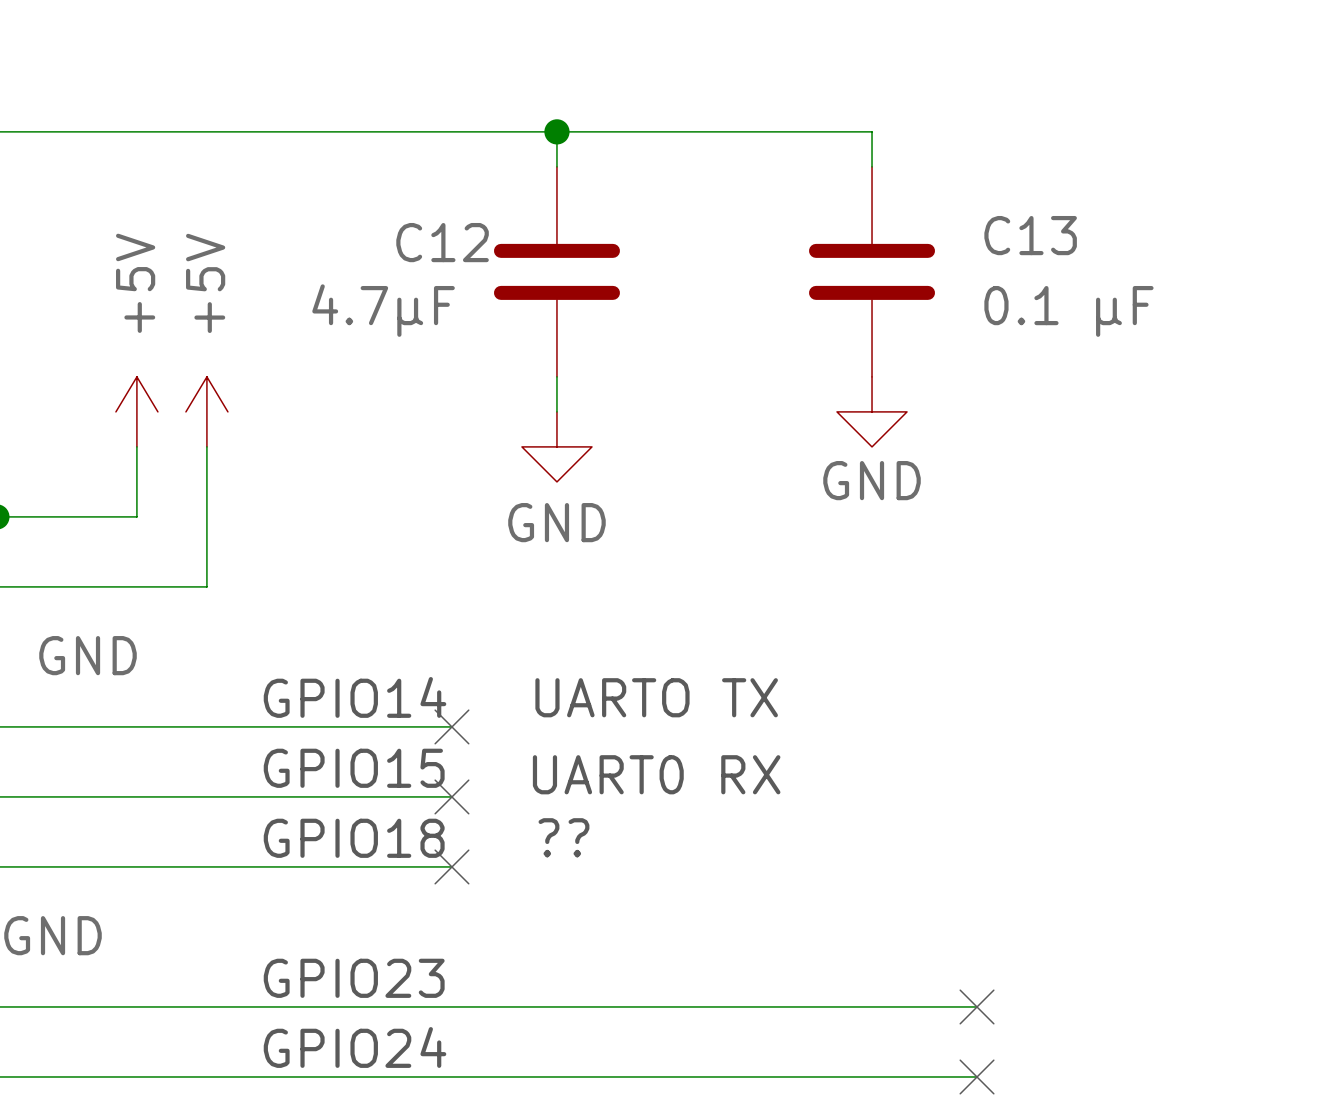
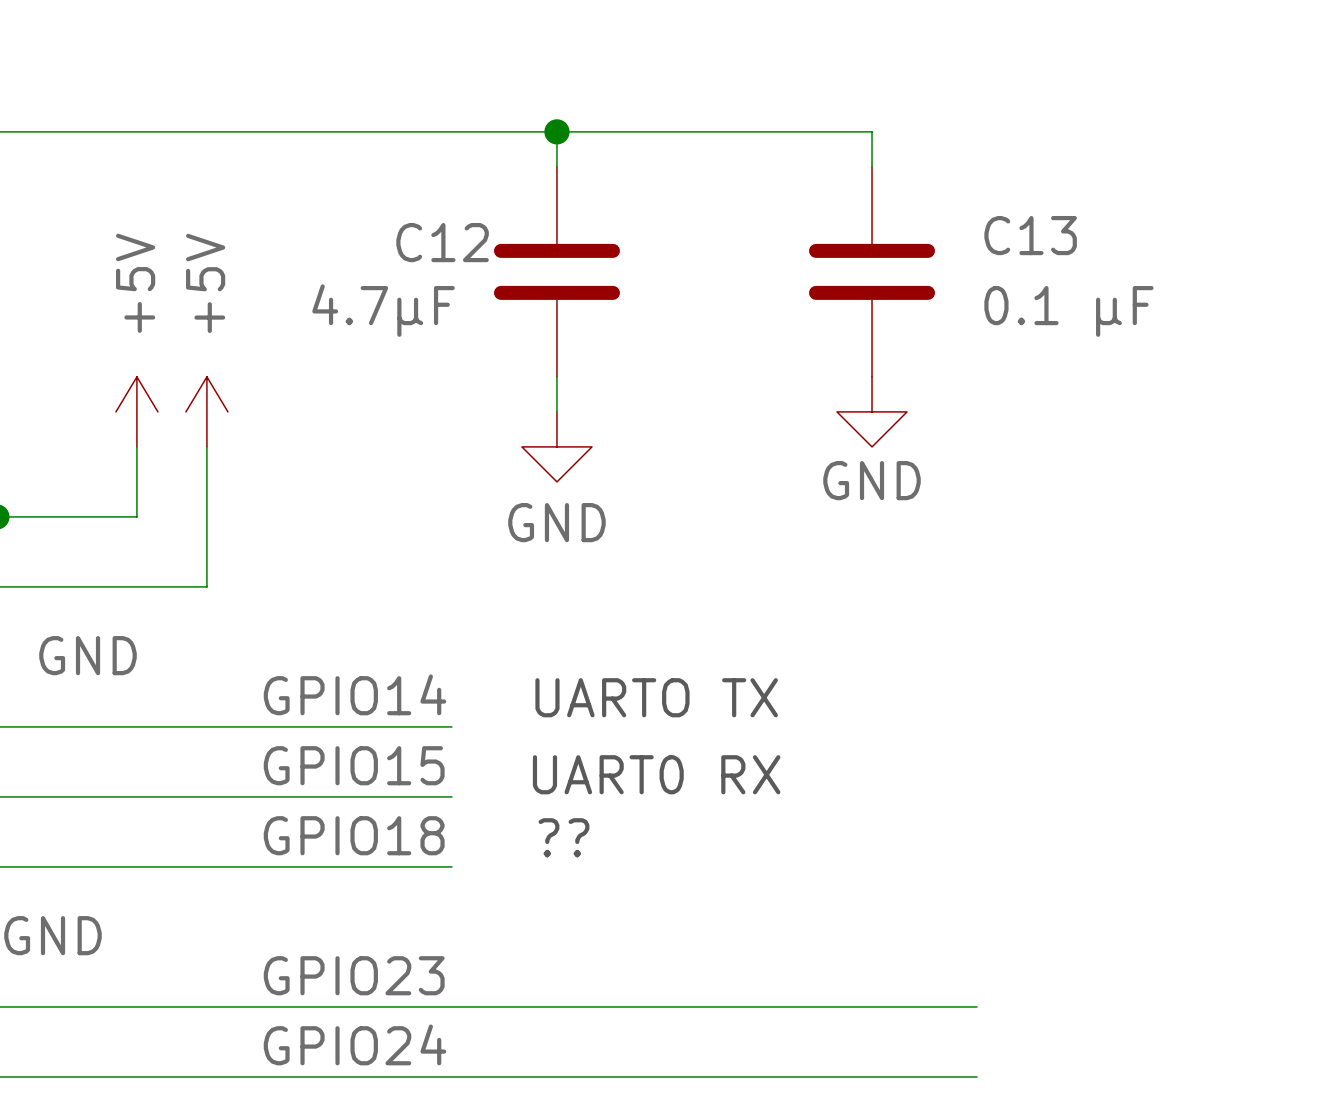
label: none -> GPIO14 (355, 694)
text: GPIO14 (355, 697) -> none
no-connect mark: (451, 726) -> none
label: none -> GPIO15 (354, 765)
text: GPIO15 (354, 768) -> none
no-connect mark: (451, 796) -> none
label: none -> GPIO18 (354, 835)
text: GPIO18 (354, 838) -> none
no-connect mark: (451, 866) -> none
label: none -> GPIO23 (354, 975)
text: GPIO23 (354, 978) -> none
no-connect mark: (977, 1006) -> none
label: none -> GPIO24 (355, 1044)
text: GPIO24 (355, 1047) -> none
no-connect mark: (977, 1076) -> none

